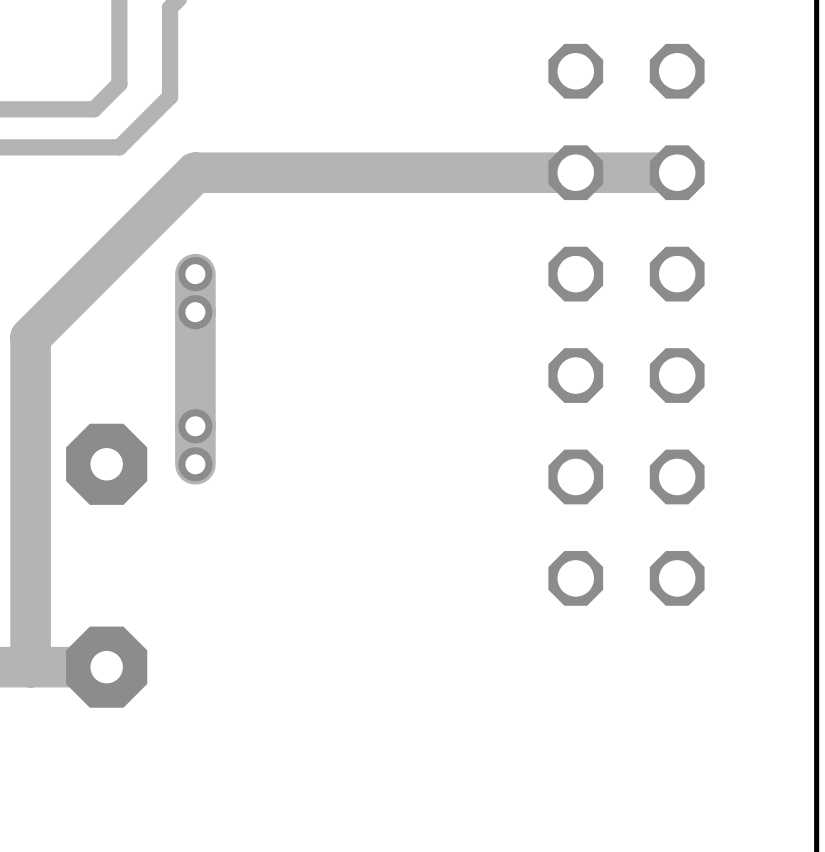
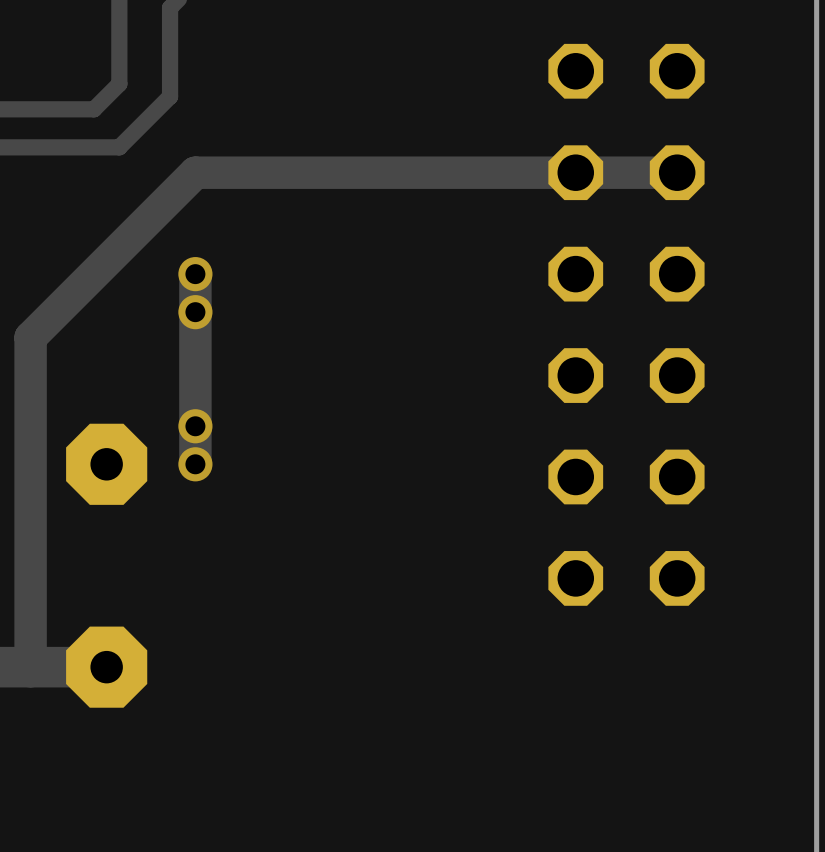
track width: thick (677, 172) (195, 172) (30, 337) (30, 667) -> thin (677, 172) (195, 172) (30, 337) (30, 667)
track width: thick (195, 274) (195, 464) -> thin (195, 274) (195, 464)

